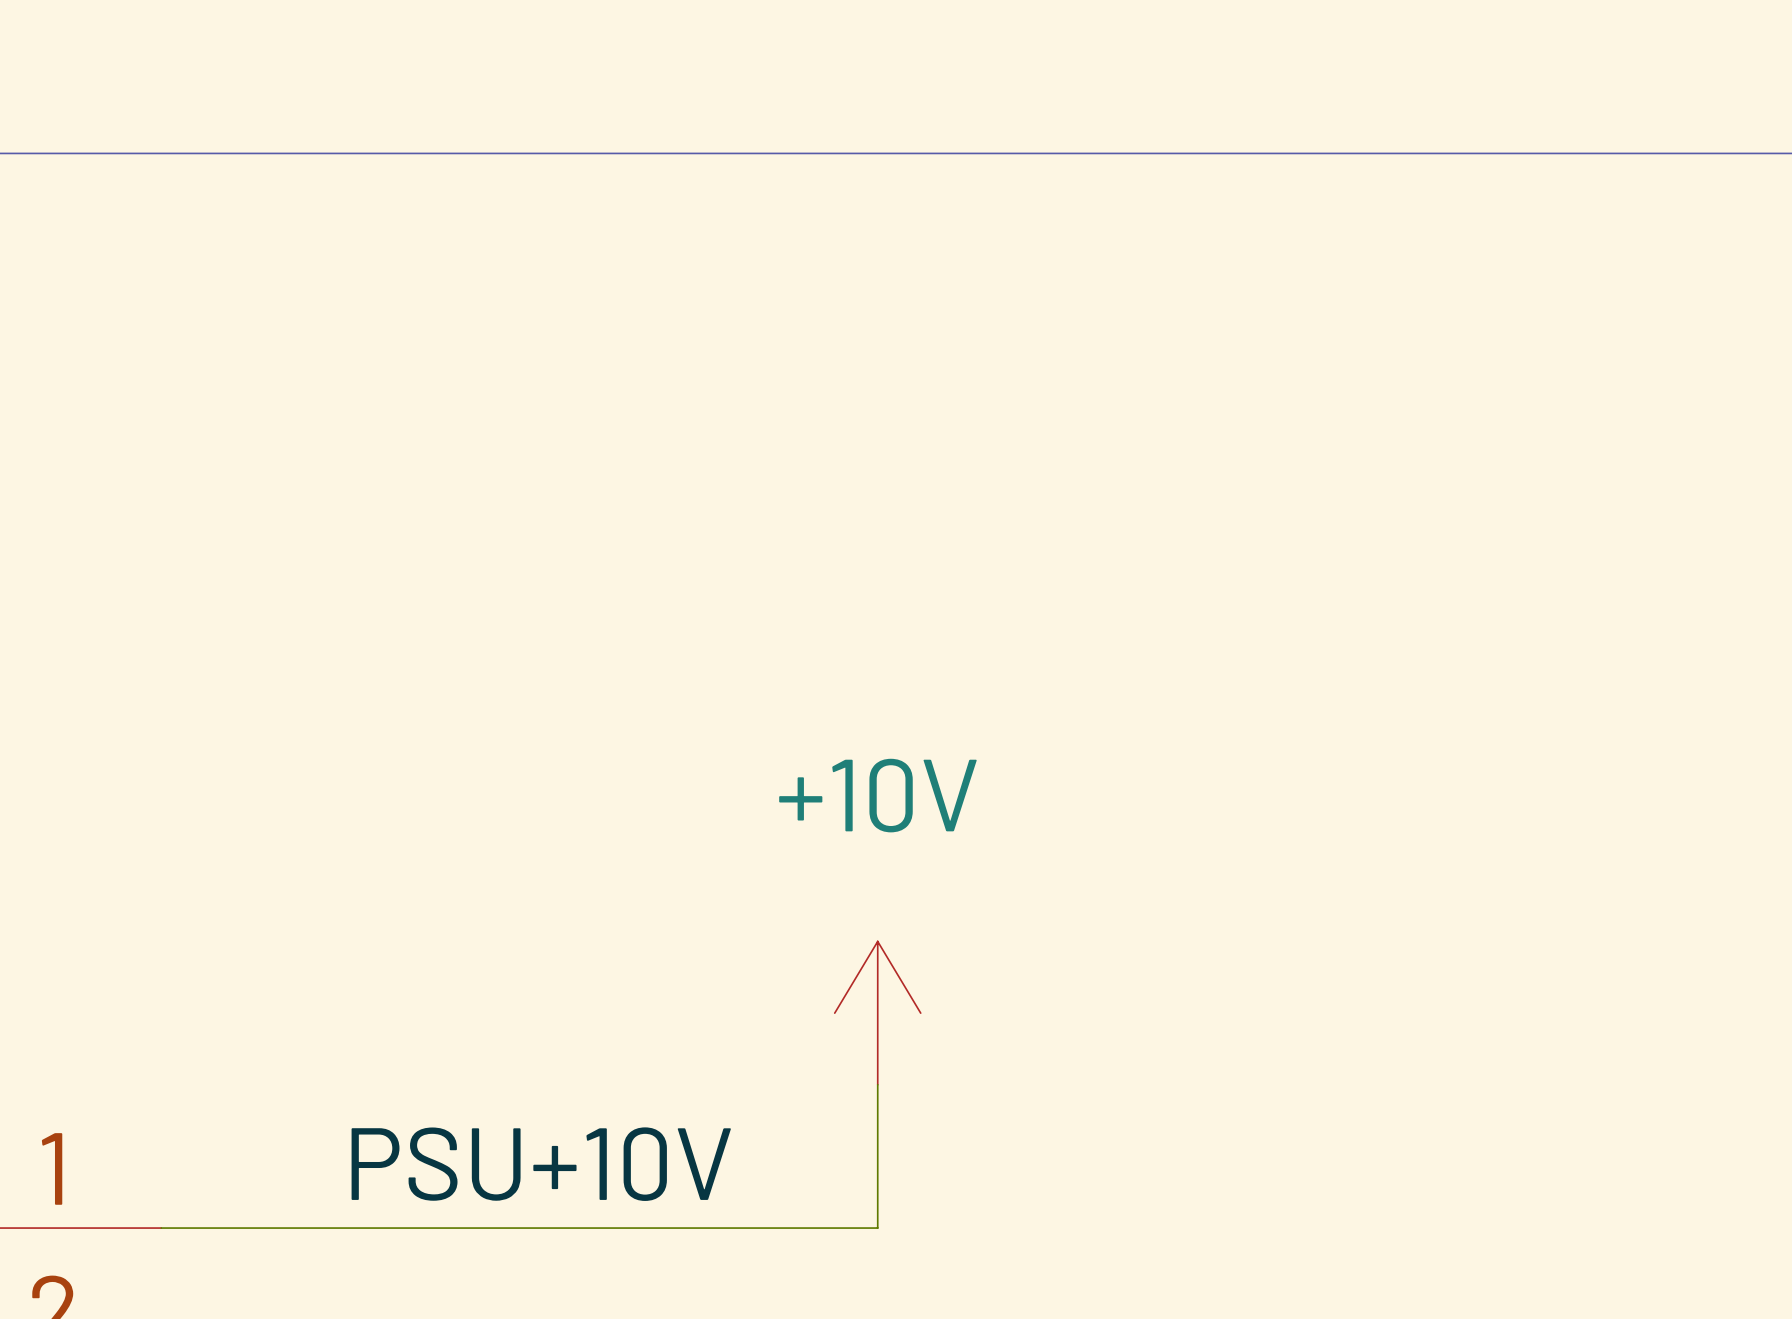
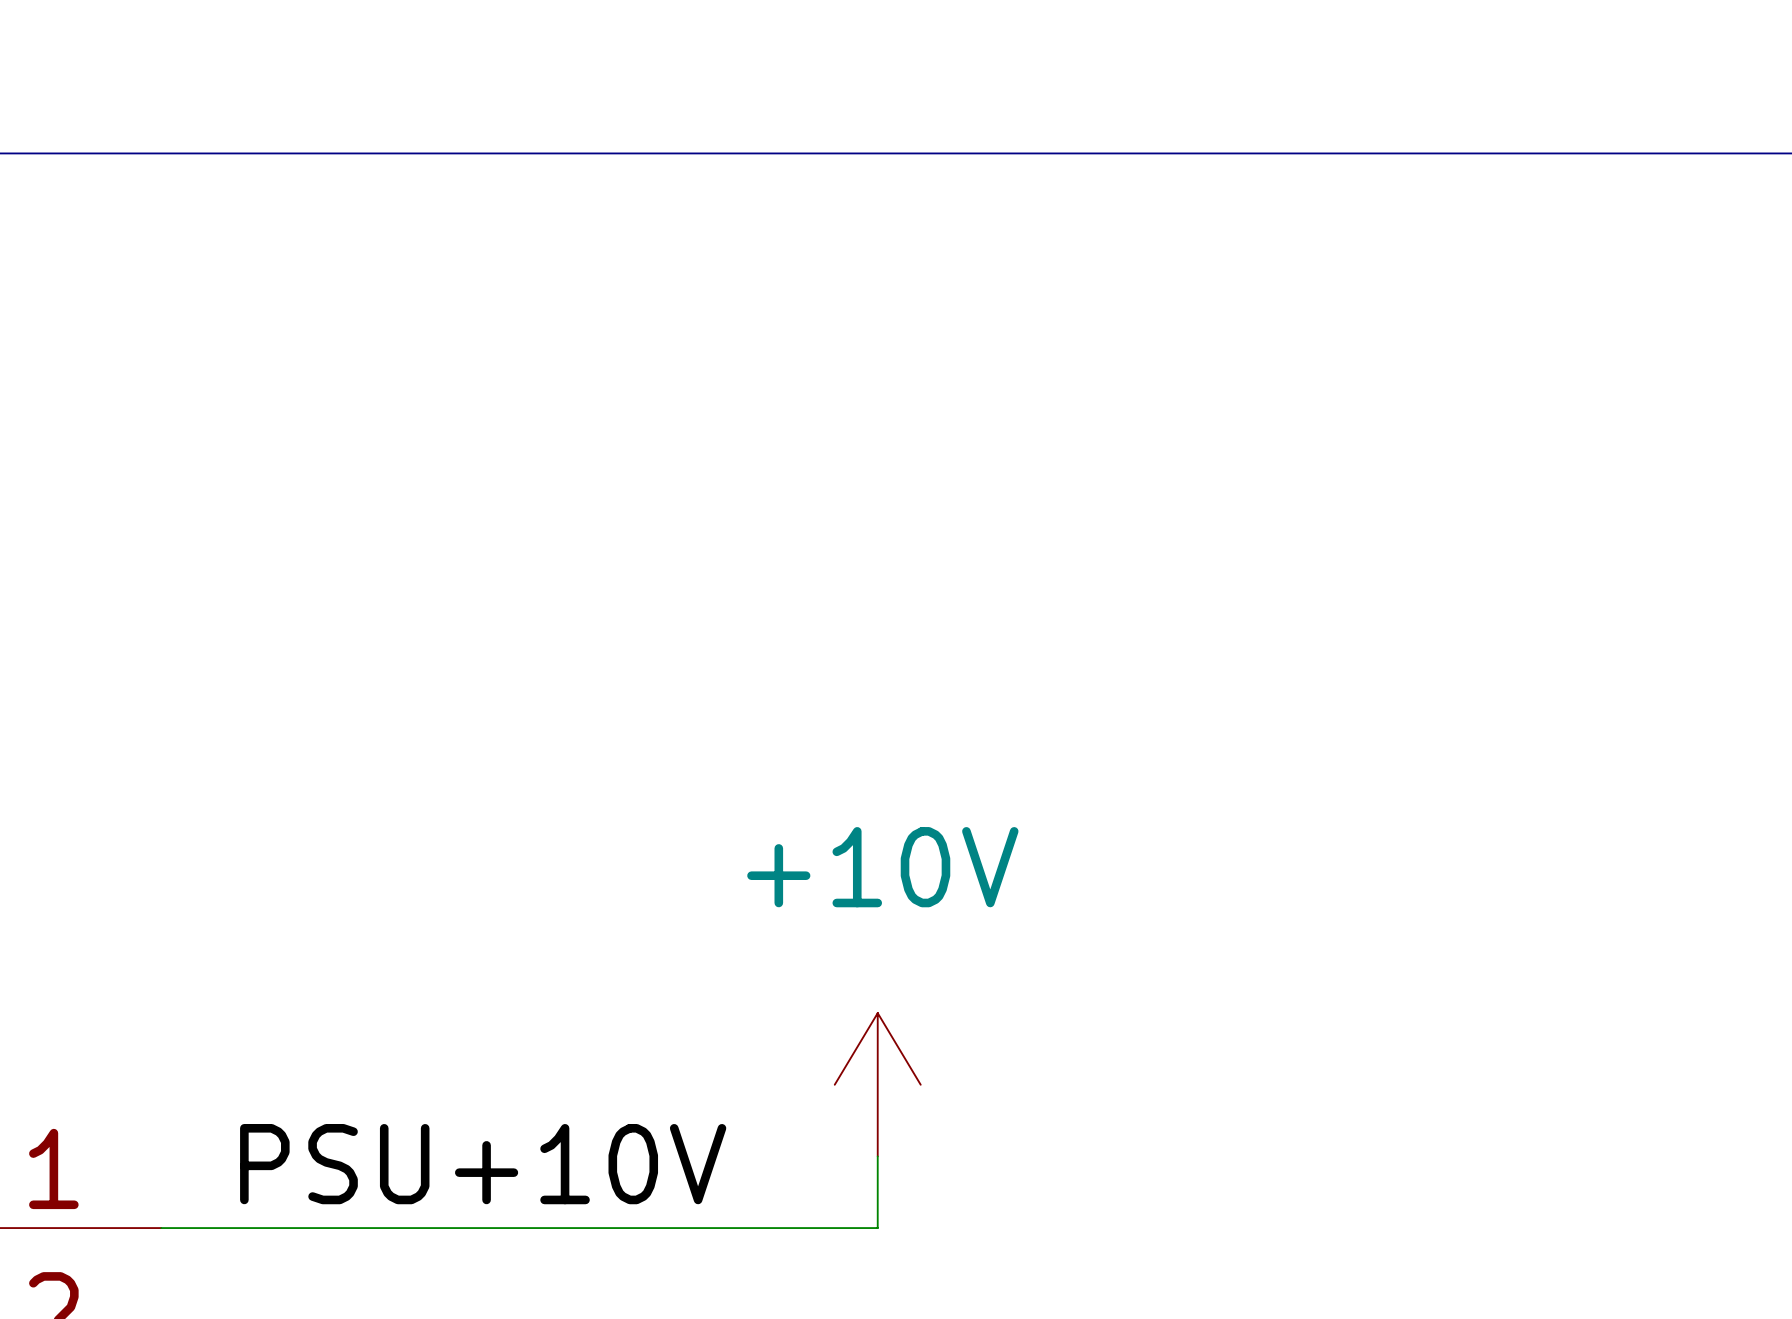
power symbol position: +10V (877, 1013) -> +10V (877, 1084)

